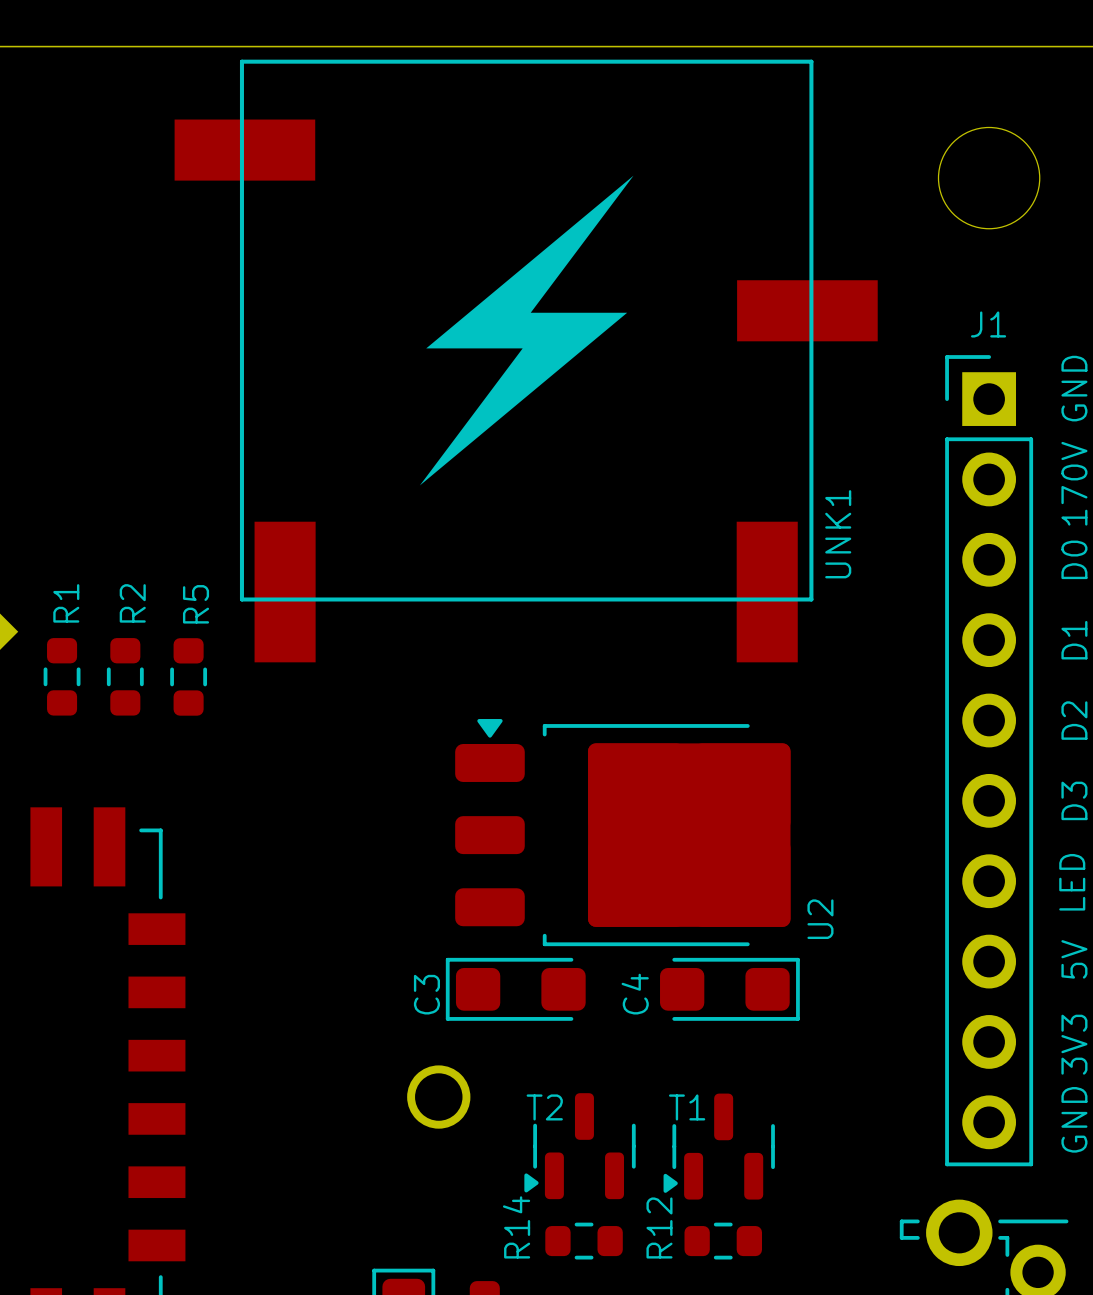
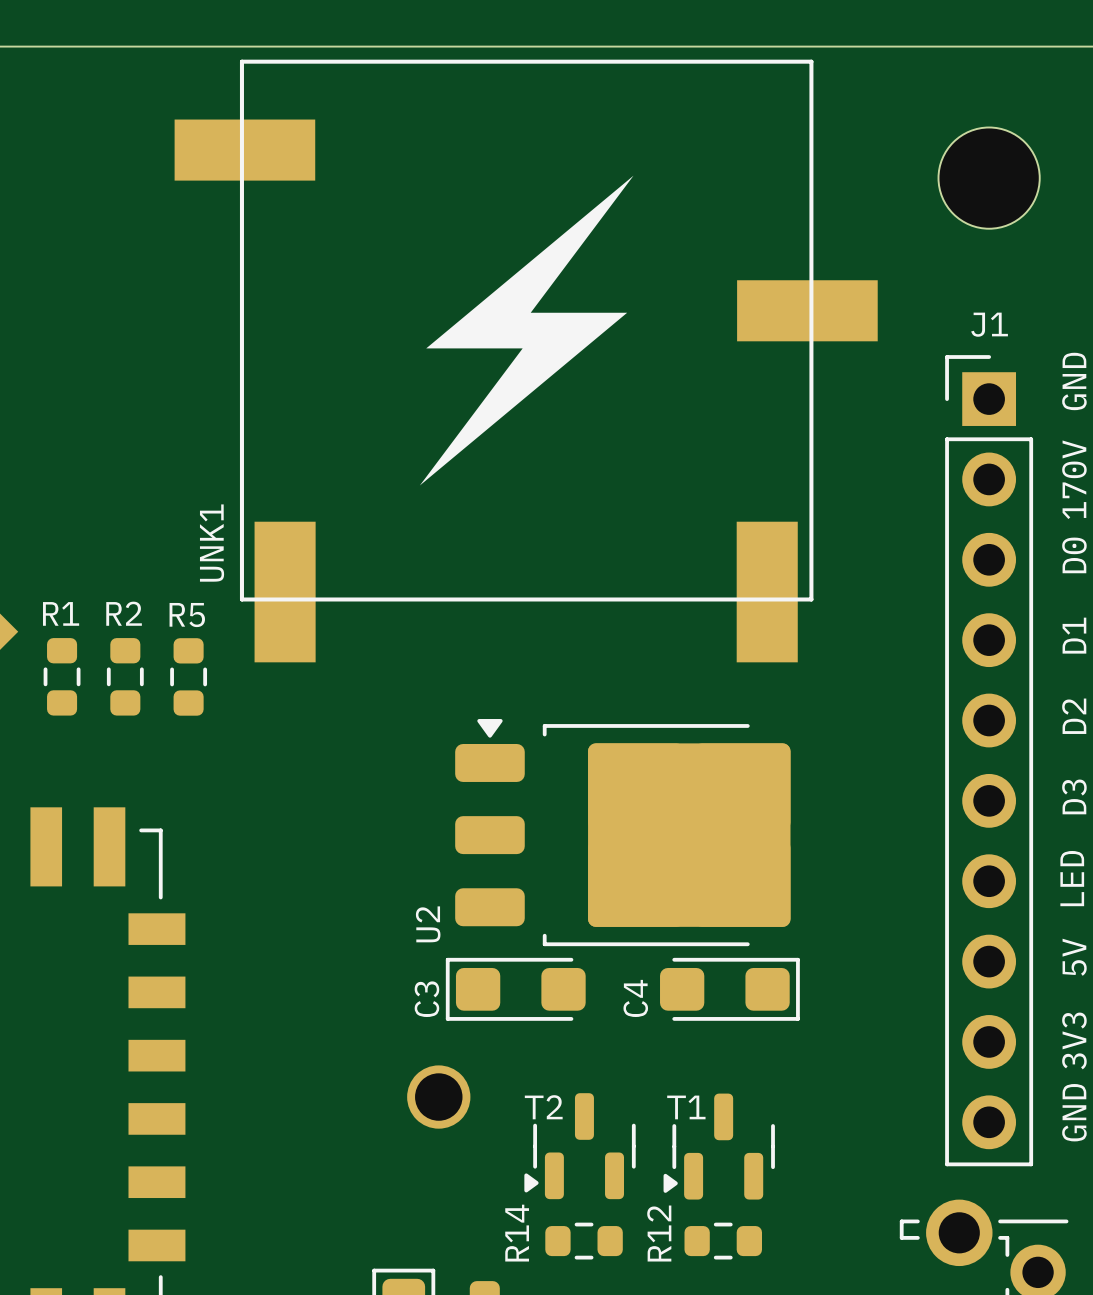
UNK1 name position: UNK1 (838, 534) -> UNK1 (212, 543)
R1 name rotation: 0° (66, 603) -> 90° clockwise (61, 613)
R2 name rotation: 0° (132, 603) -> 90° clockwise (124, 613)
R5 name rotation: 0° (196, 604) -> 90° clockwise (187, 615)
U2 name position: U2 (820, 919) -> U2 (428, 924)

